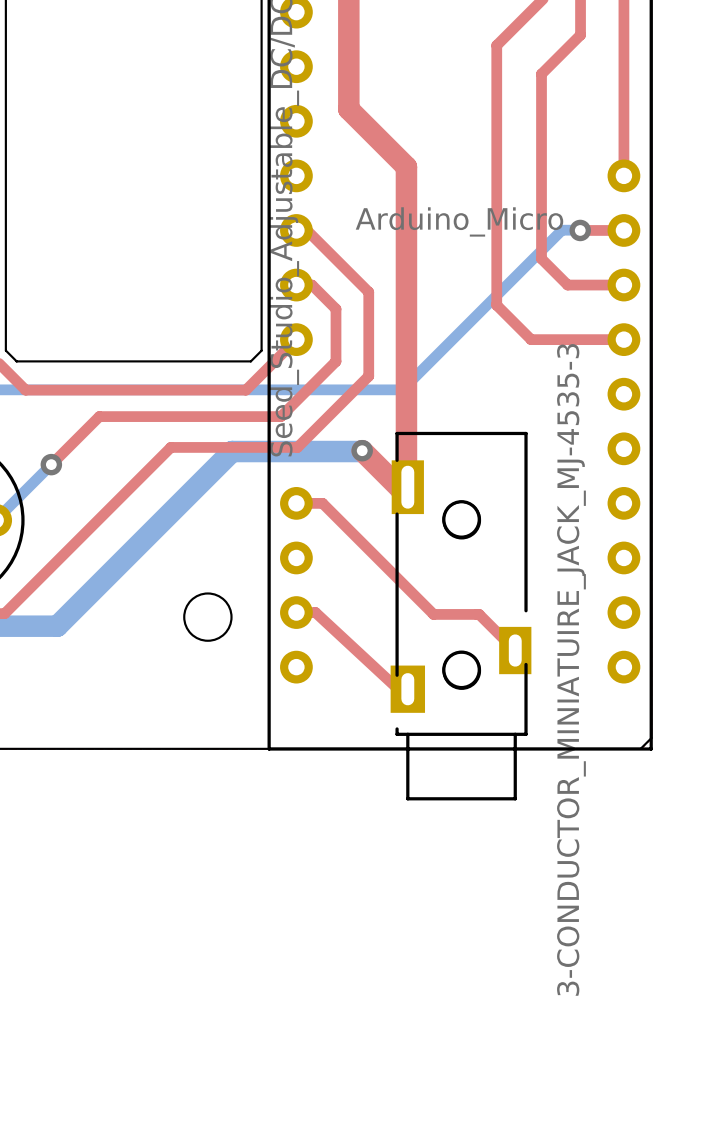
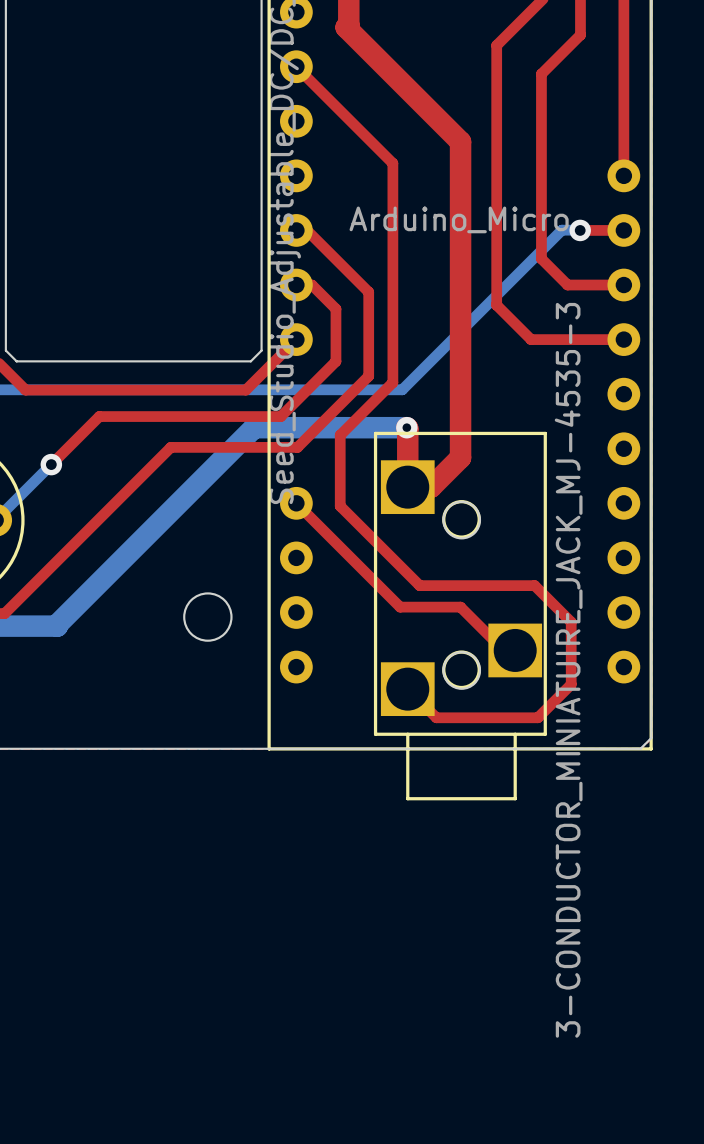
top track: (348, 24) (348, 109) (406, 166) (406, 488) (400, 488) (362, 450) -> (348, 24) (346, 27) (460, 141) (460, 457) (431, 487) (407, 487) (406, 427)
top track: none -> (296, 66) (392, 163) (392, 382) (340, 435) (340, 506) (419, 585) (534, 585) (571, 622) (571, 684) (537, 717) (436, 717) (407, 689)
via: none -> (406, 427)
part footprint: [390, 431, 532, 801] -> [373, 431, 547, 801]
bottom track: (362, 450) (232, 451) (57, 626) -> (406, 427) (254, 427) (57, 626)
via: (362, 450) -> none
top track: (296, 503) (322, 503) (433, 614) (479, 614) (515, 650) -> (296, 503) (400, 607) (460, 607) (503, 650) (515, 650)
top track: (296, 612) (315, 612) (406, 696) -> none

